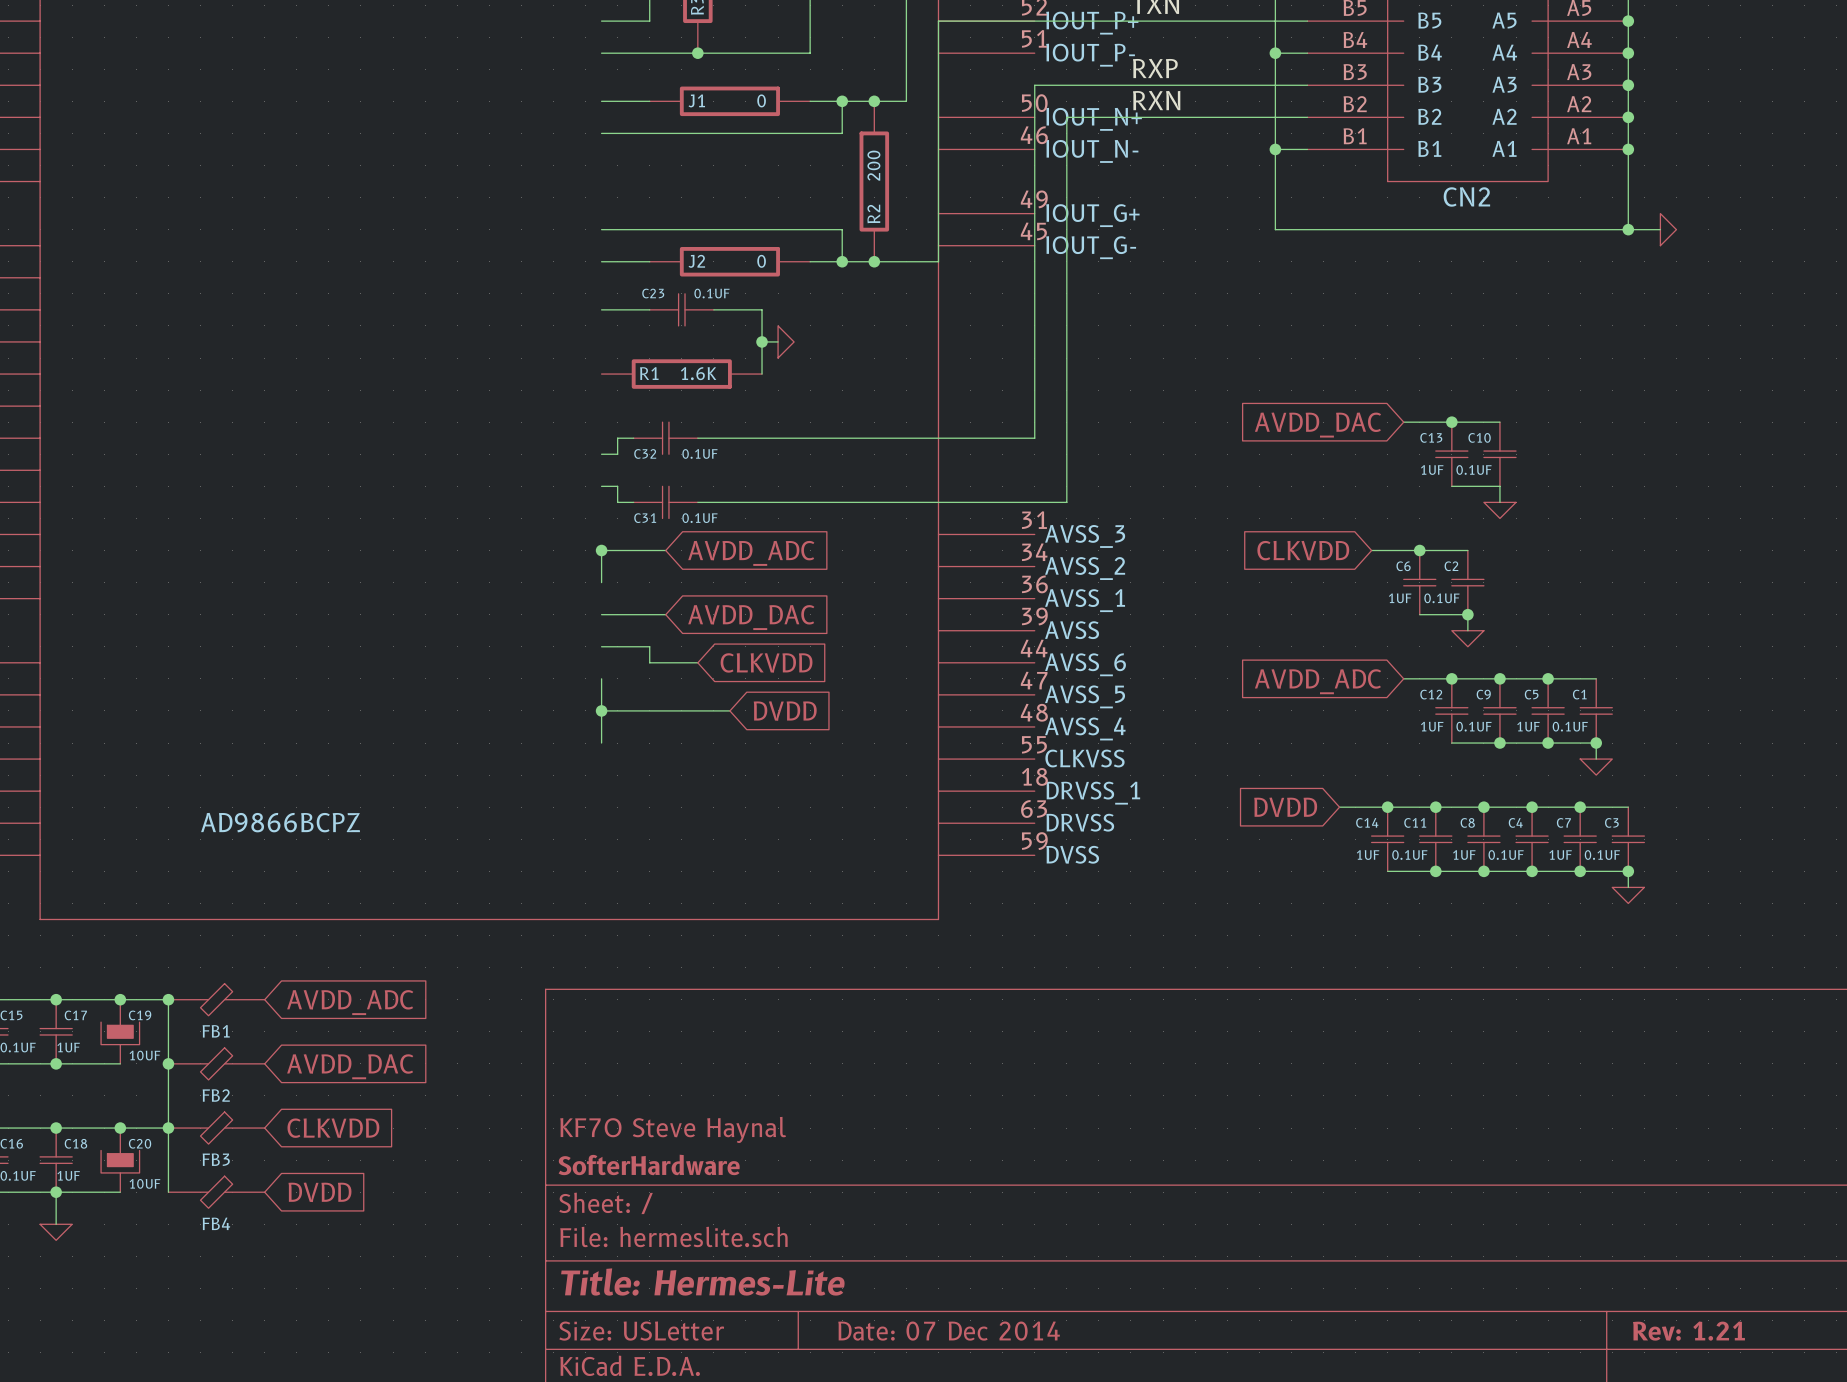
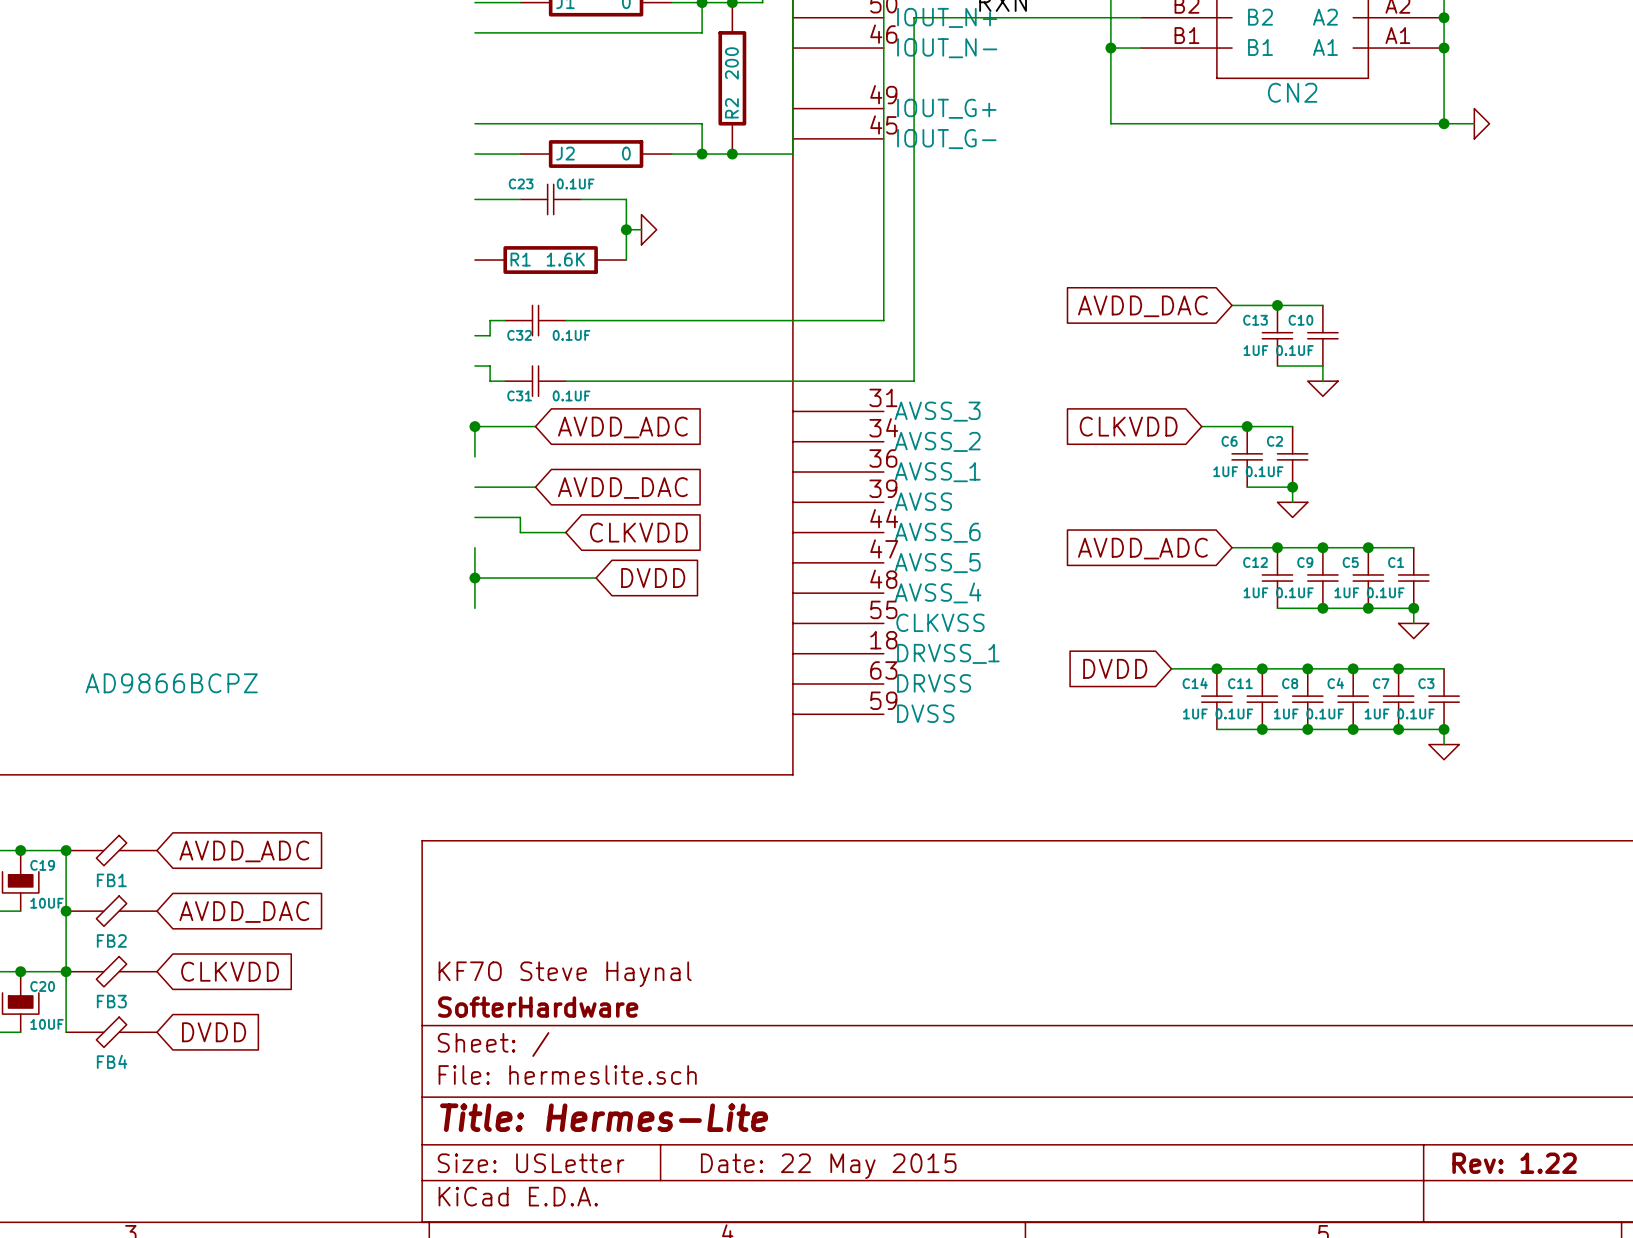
title block: Date: 07 Dec 2014 (949, 1331) -> Date: 22 May 2015 (828, 1166)
title block: Rev: 1.21 (1688, 1331) -> Rev: 1.22 (1514, 1163)

